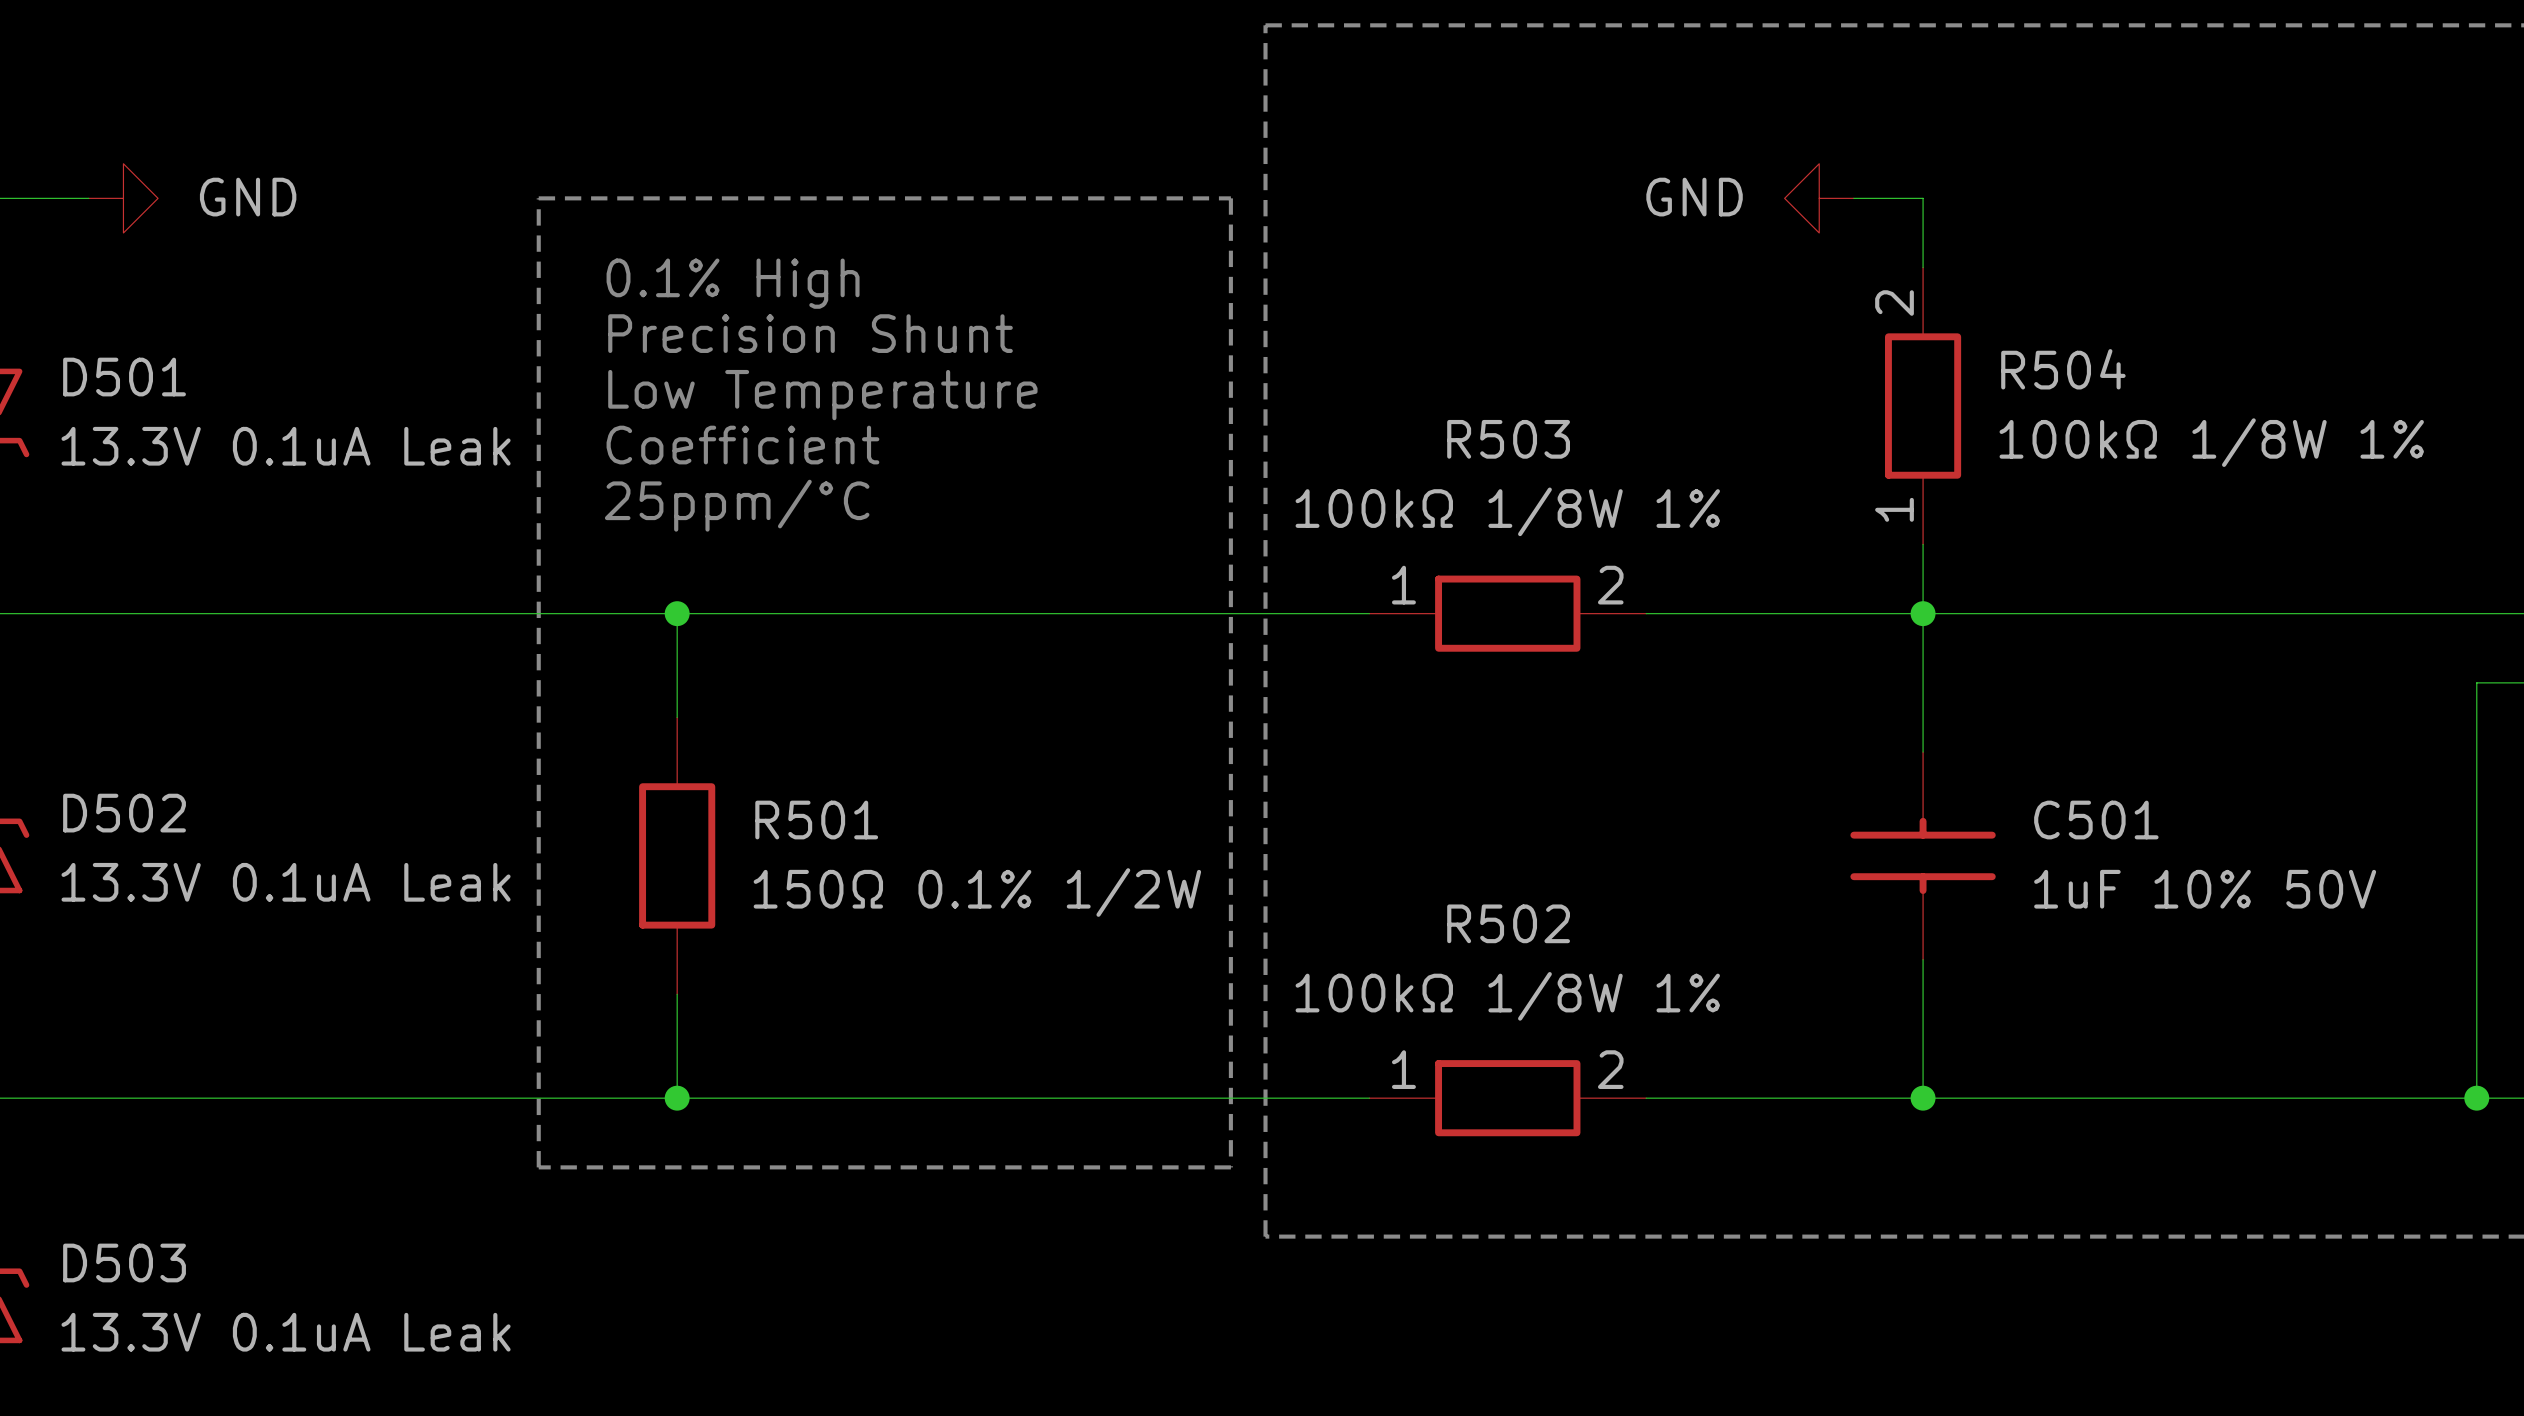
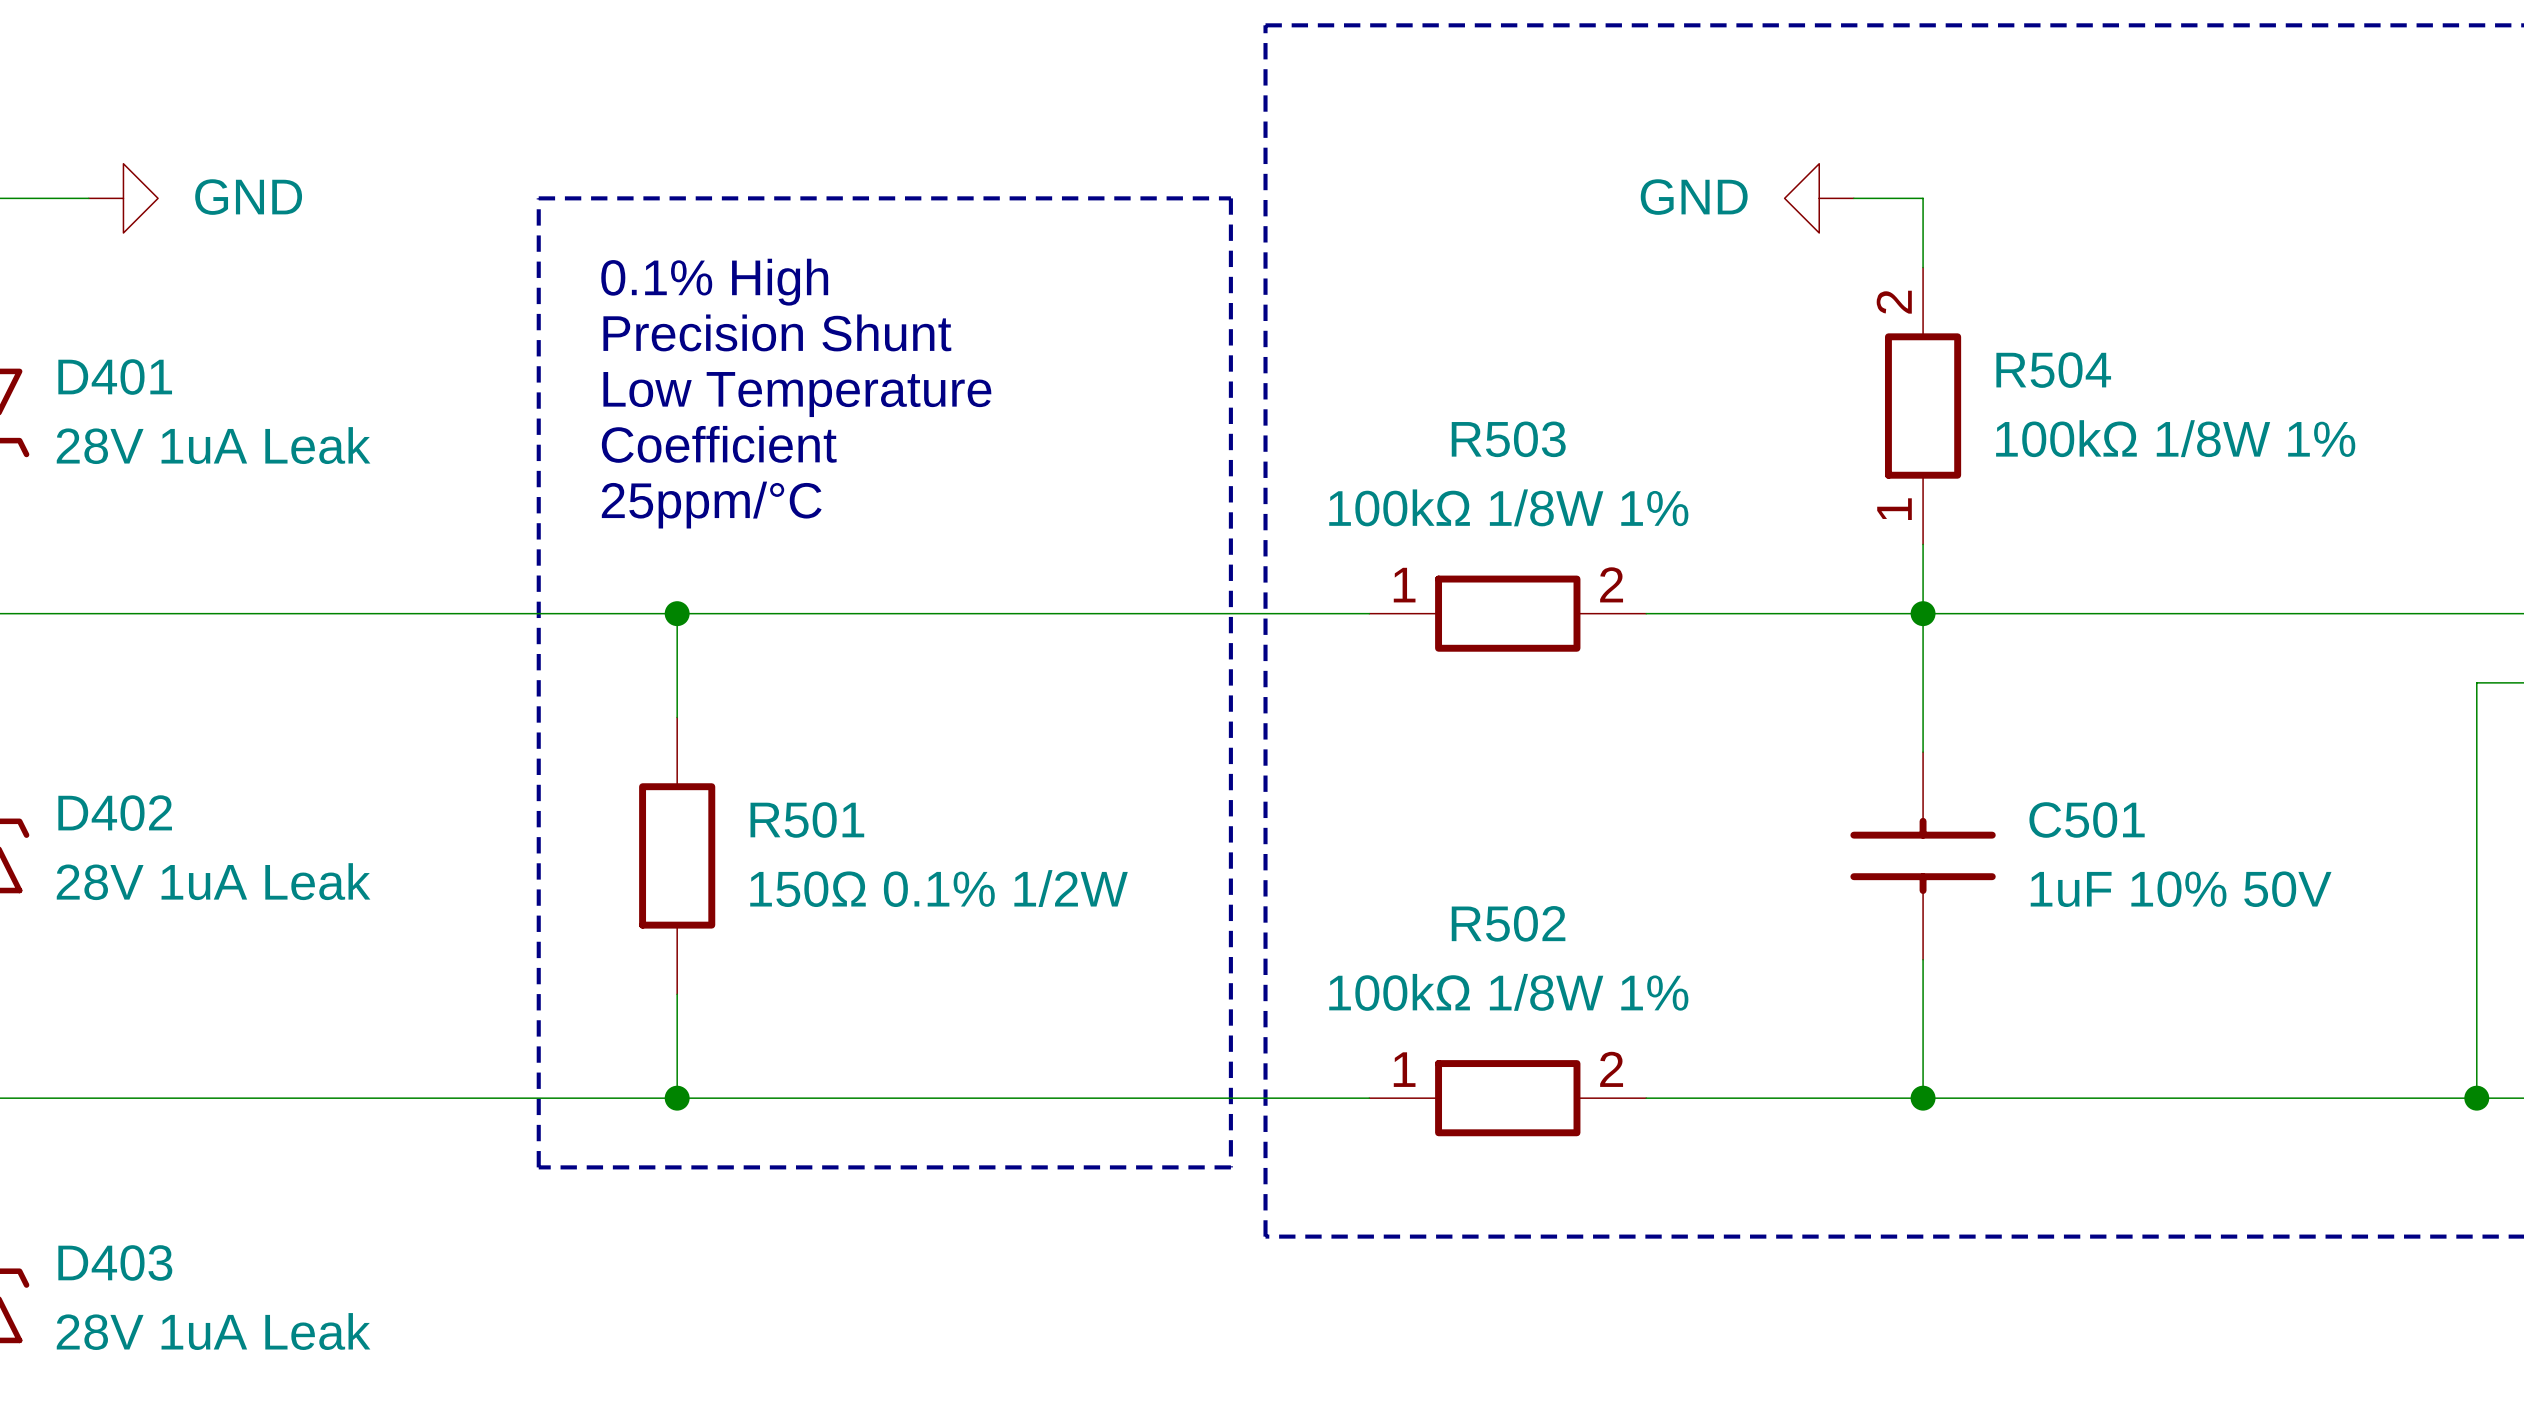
D501 name: D501 (124, 377) -> D401 (115, 377)
D501 value: 13.3V 0.1uA Leak (286, 446) -> 28V 1uA Leak (213, 445)
D502 name: D502 (124, 813) -> D402 (115, 813)
D502 value: 13.3V 0.1uA Leak (286, 882) -> 28V 1uA Leak (213, 881)
D503 name: D503 (124, 1262) -> D403 (115, 1262)
D503 value: 13.3V 0.1uA Leak (286, 1332) -> 28V 1uA Leak (213, 1331)

